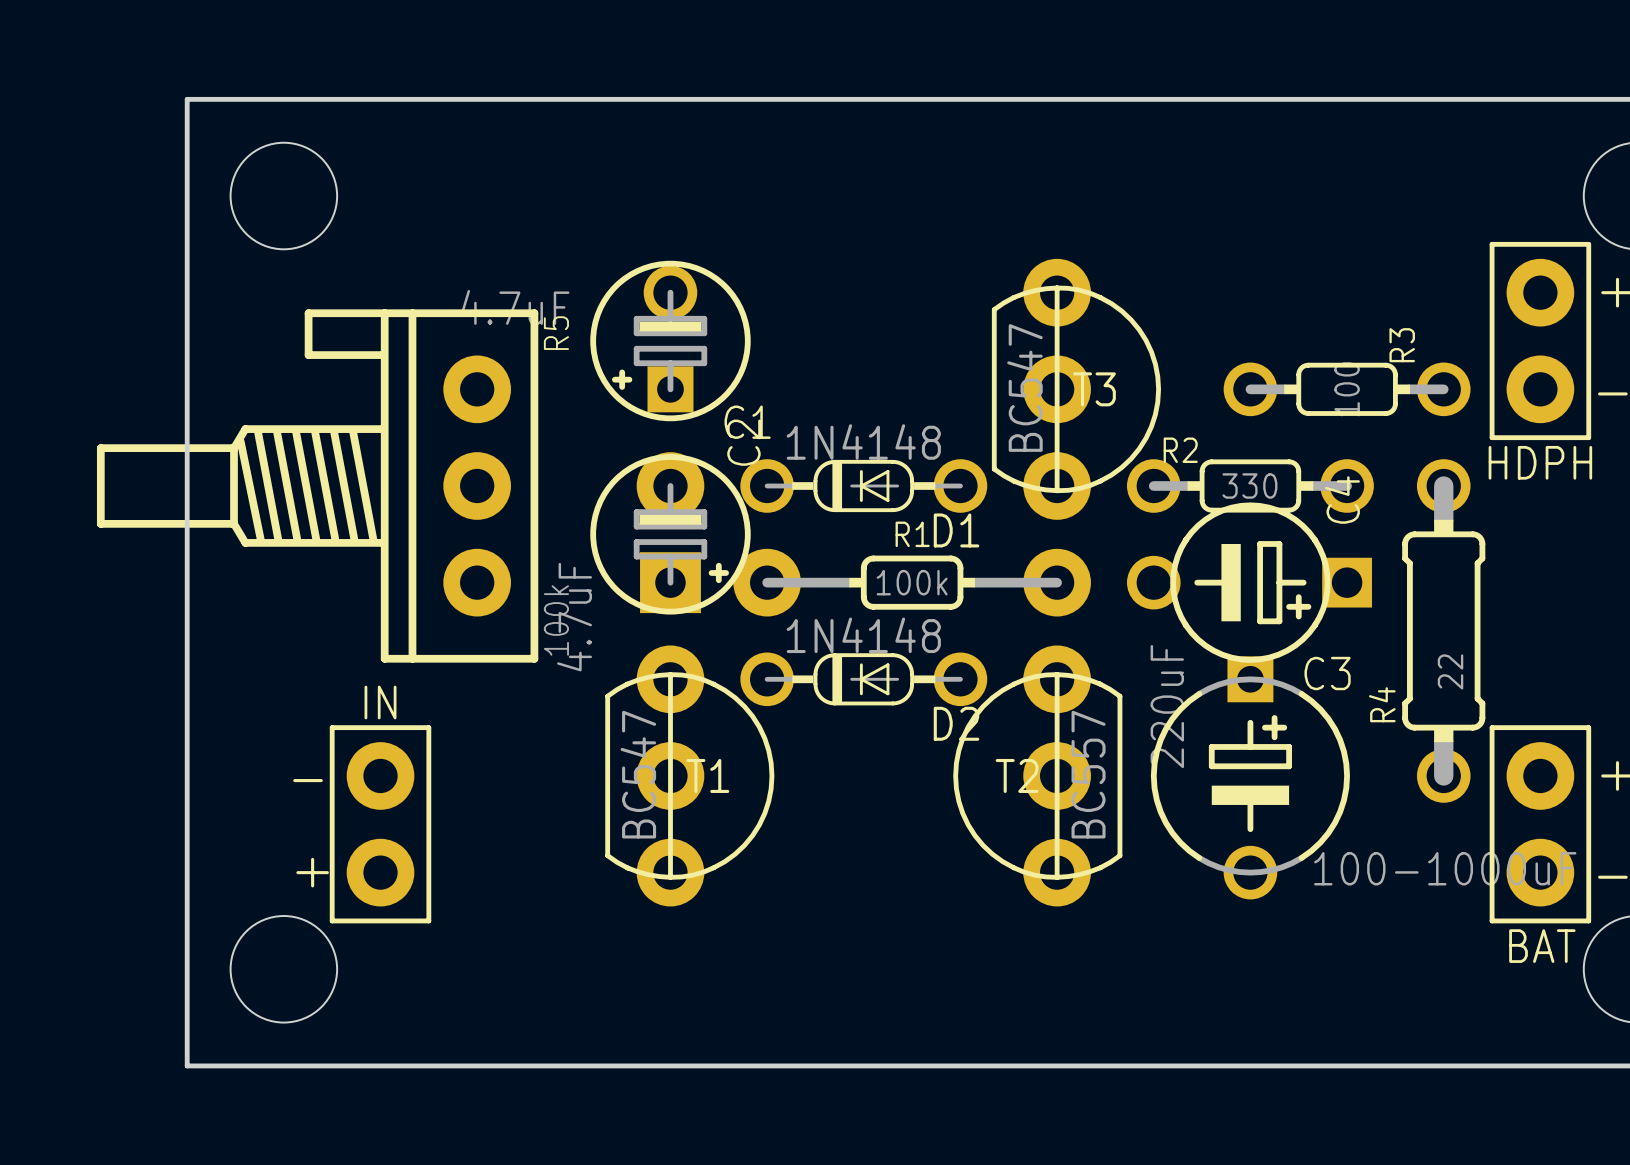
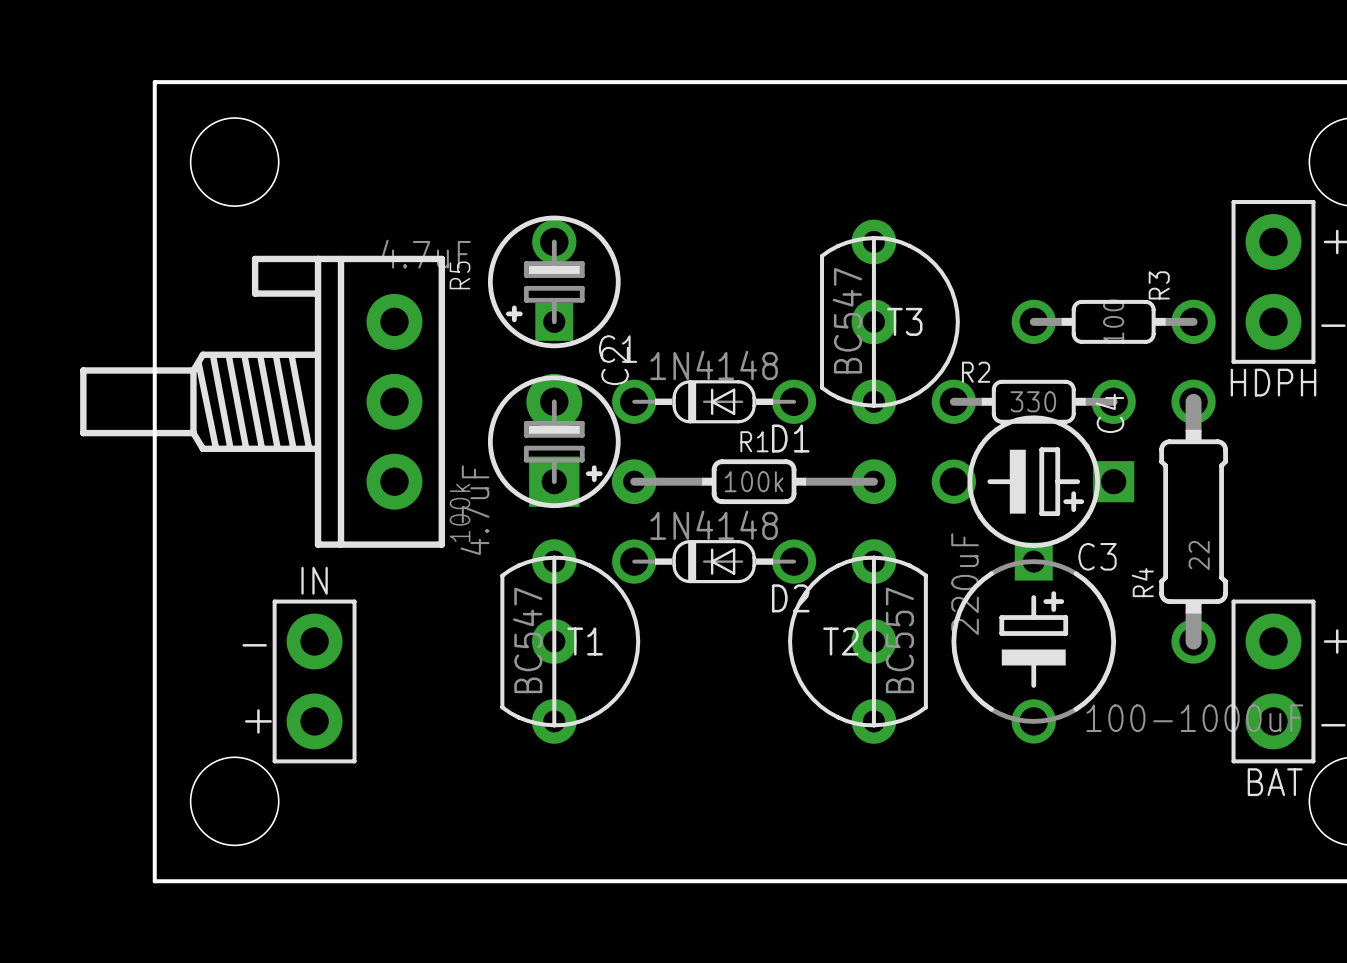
T3 footprint: [991, 258, 1162, 520] -> [820, 219, 960, 425]
R1 footprint: [733, 548, 1091, 617] -> [611, 459, 897, 505]
T1 footprint: [605, 645, 775, 907] -> [500, 539, 641, 744]
T2 footprint: [953, 645, 1123, 907] -> [788, 539, 928, 744]

